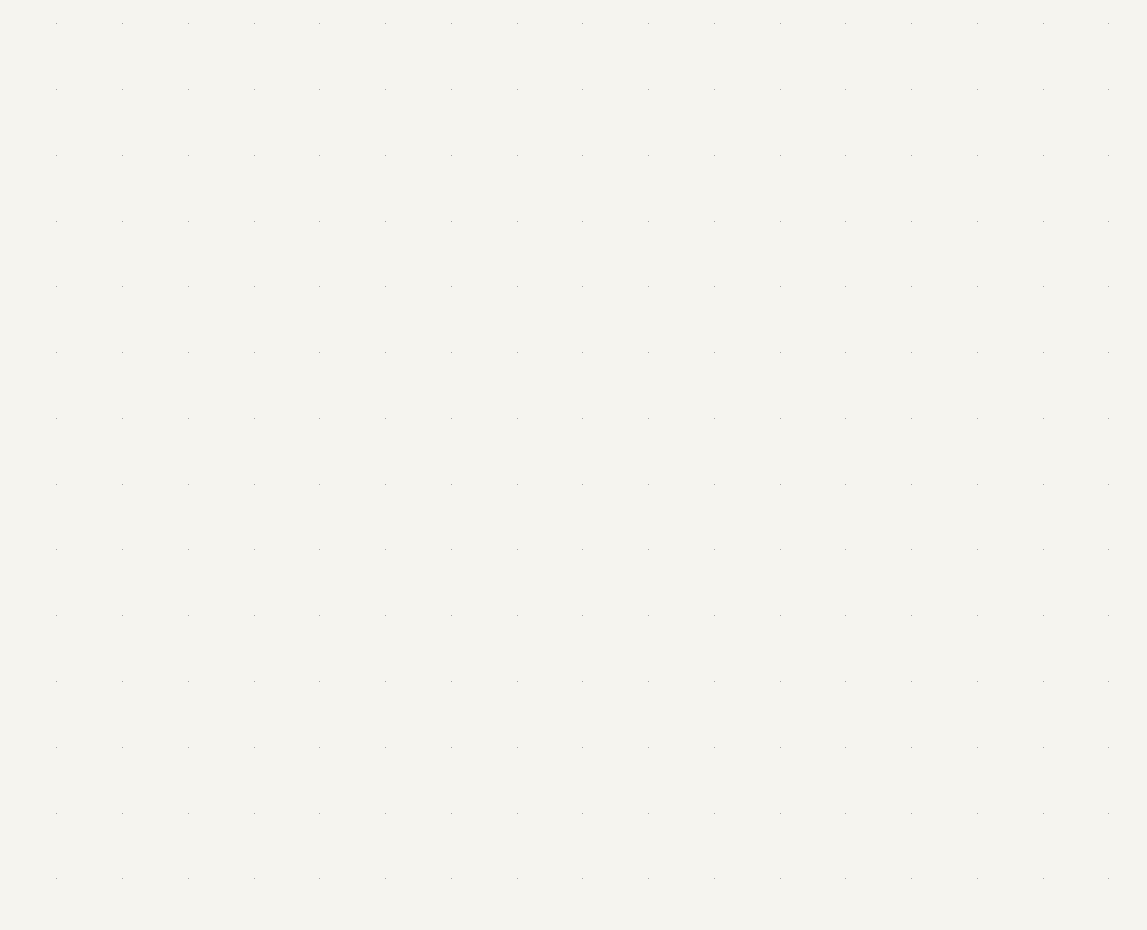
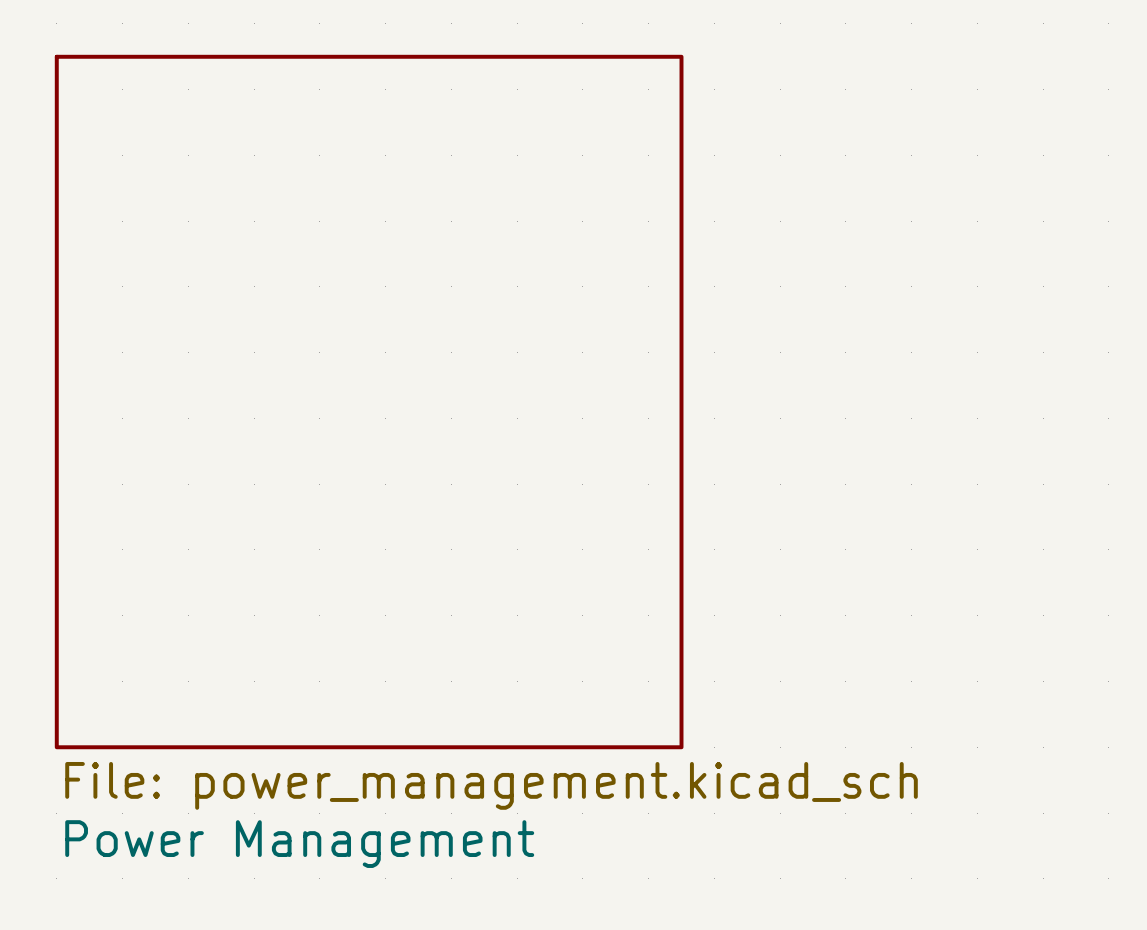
sheet Power Management: none -> File: power_management.kicad_sch (369, 402)

